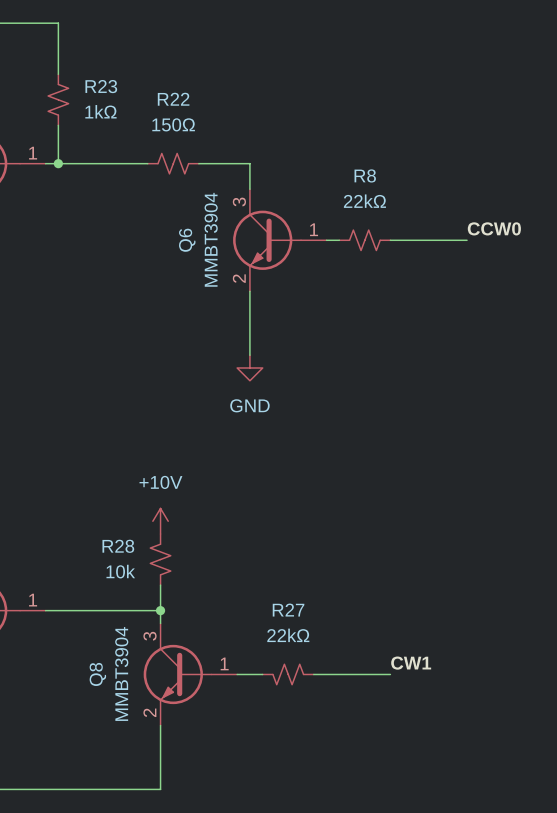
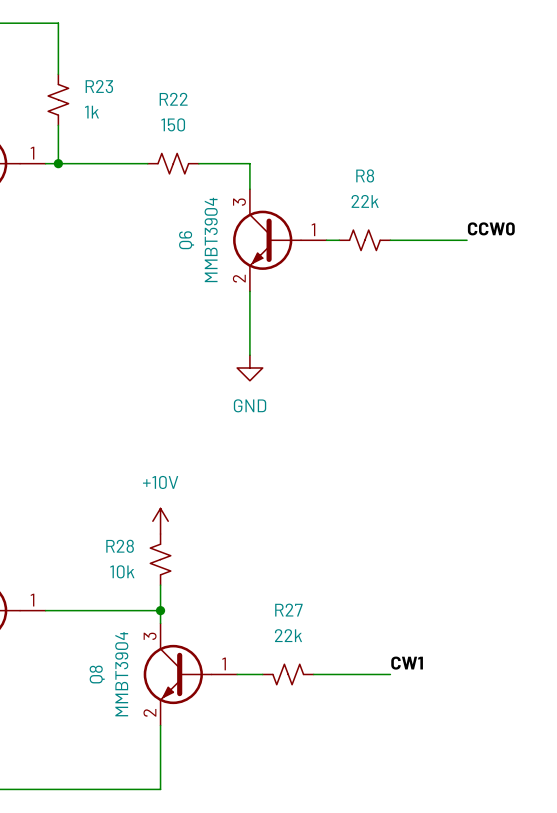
R23 value: 1kΩ (100, 111) -> 1k (91, 112)
R22 value: 150Ω (173, 124) -> 150 (173, 124)
R8 value: 22kΩ (364, 201) -> 22k (365, 201)
R27 value: 22kΩ (288, 635) -> 22k (288, 635)

